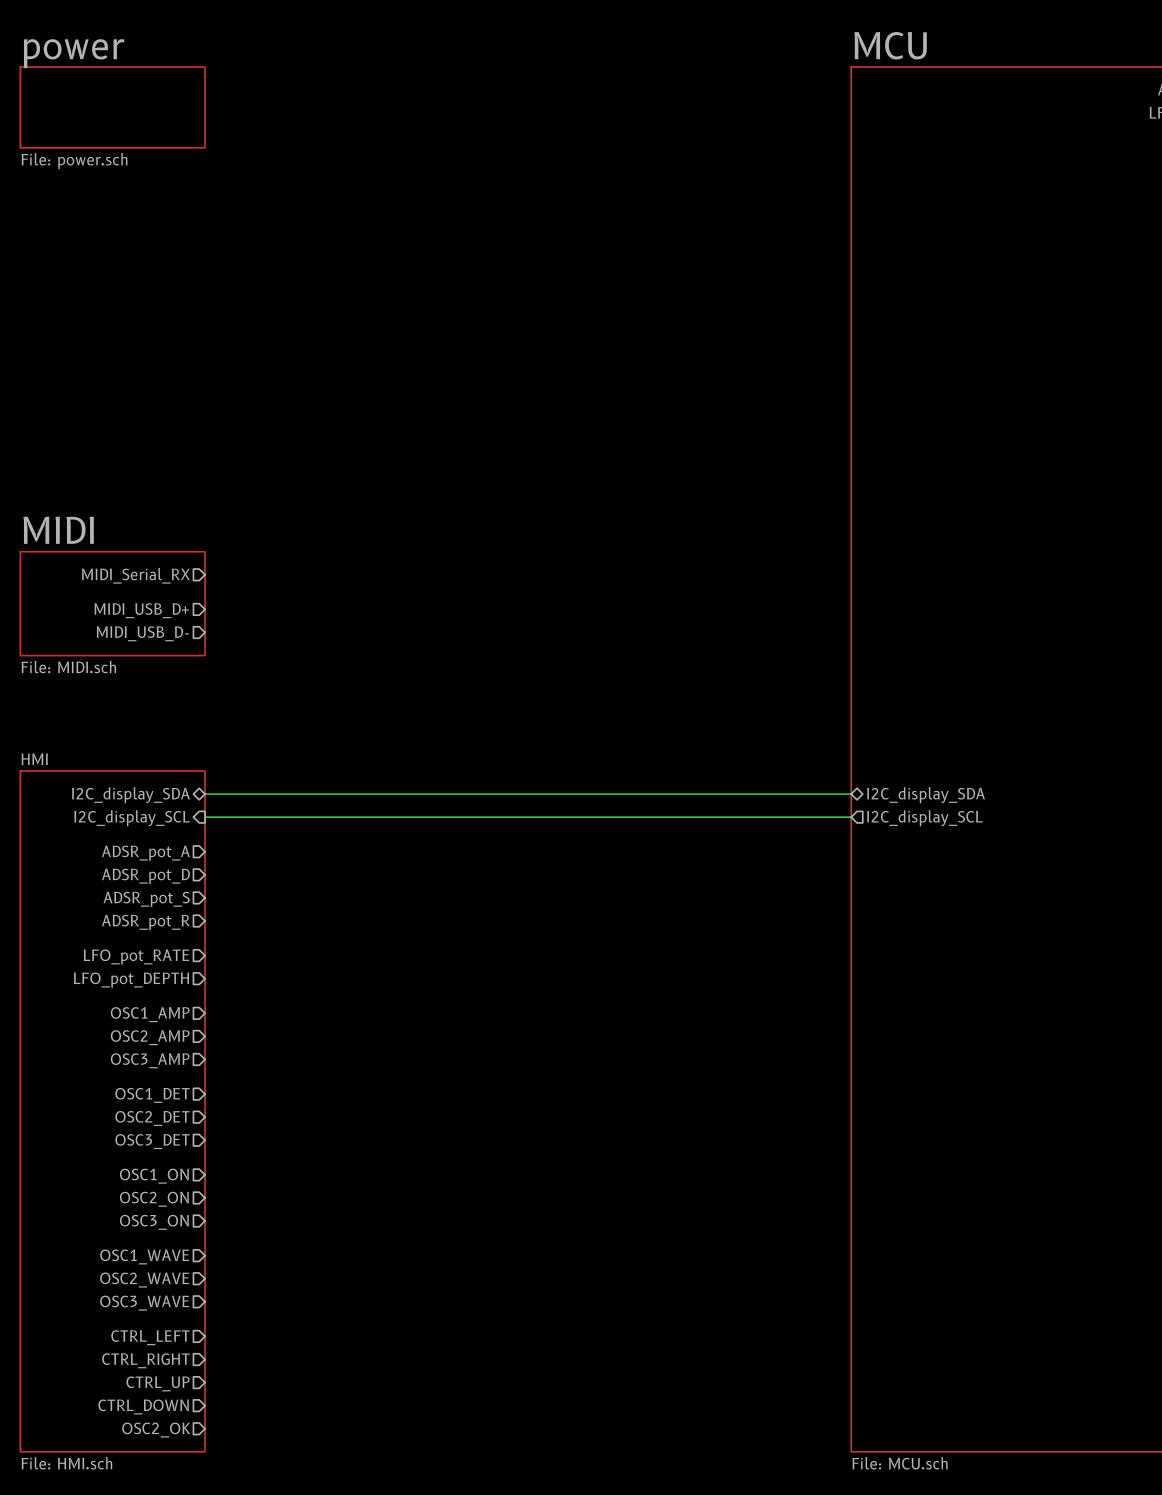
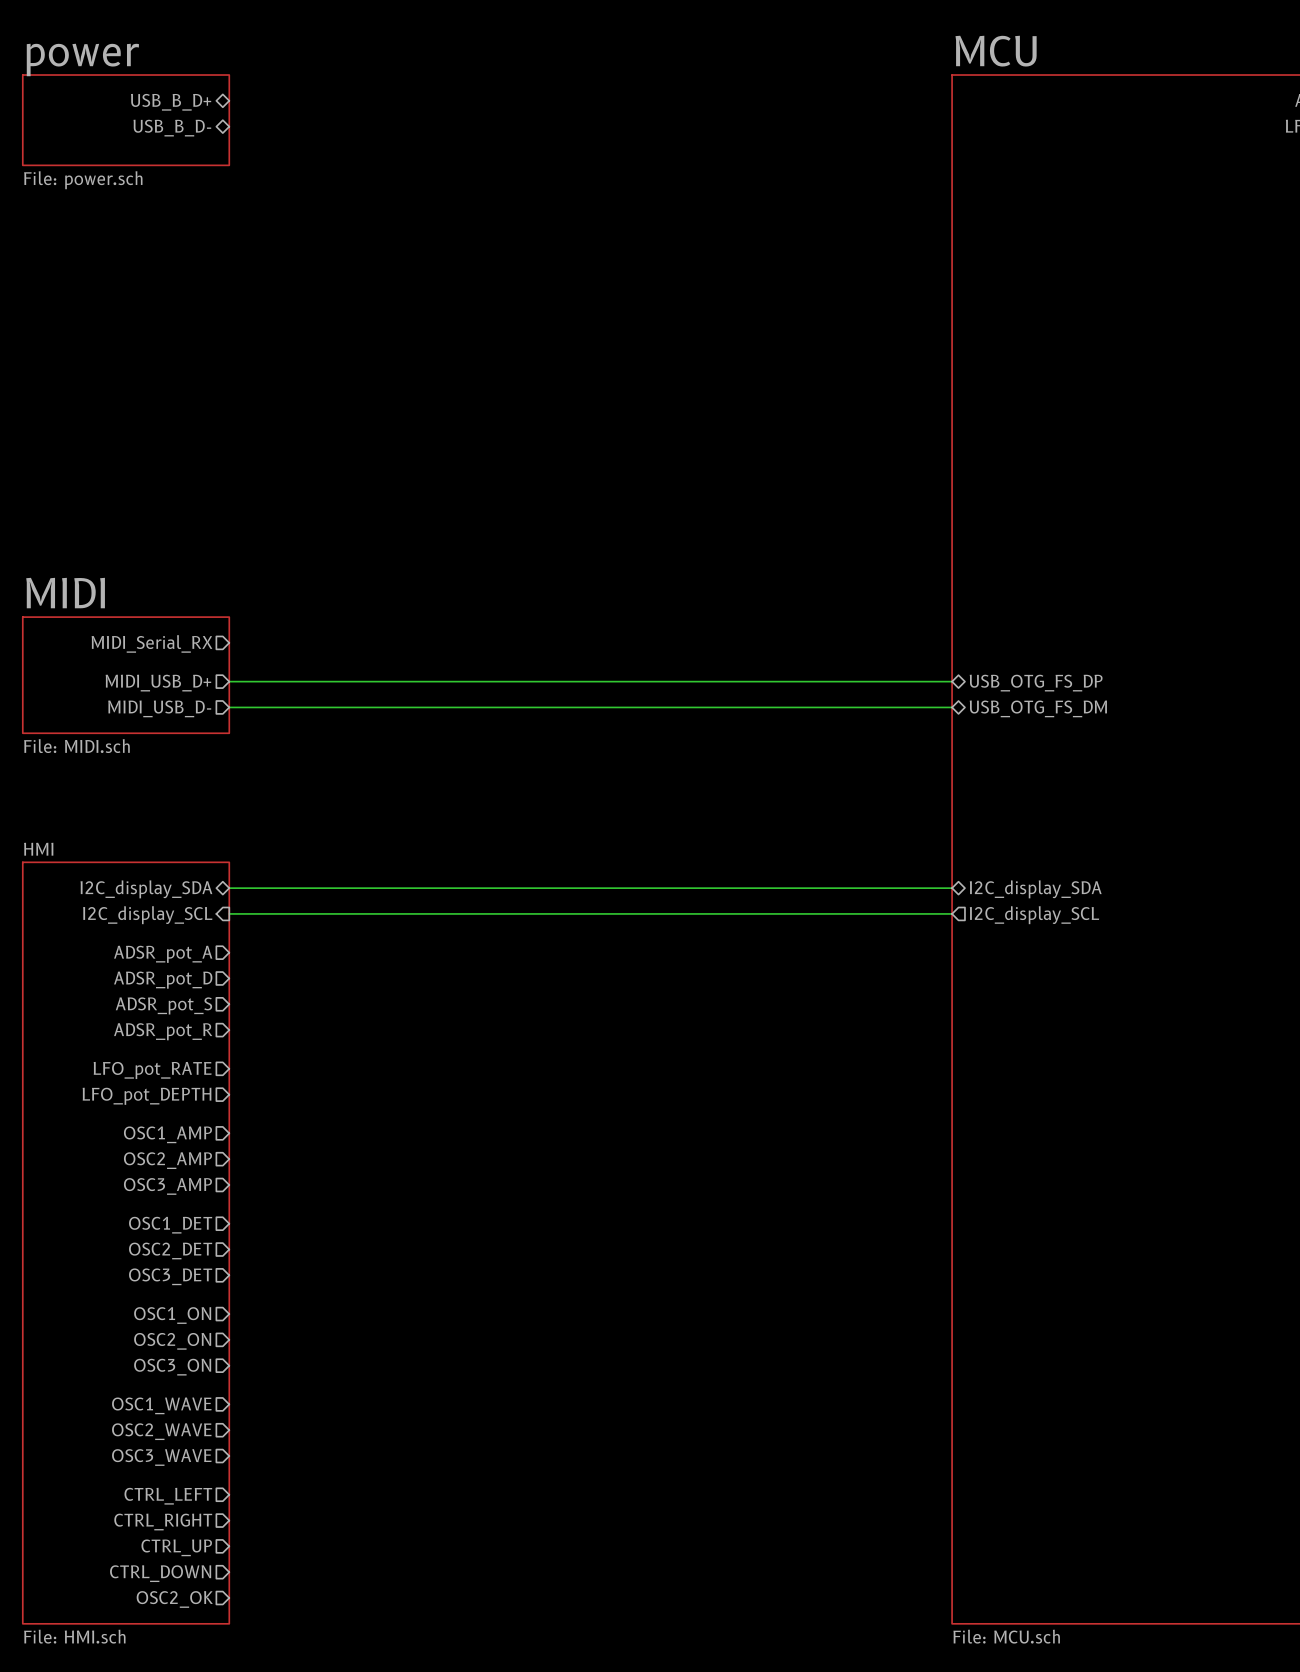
sheet pin: none -> USB_B_D+ (171, 102)
sheet pin: none -> USB_B_D- (172, 128)
wire: none -> (229, 681) (952, 681)
sheet pin: none -> USB_OTG_FS_DP (1036, 683)
wire: none -> (229, 707) (952, 707)
sheet pin: none -> USB_OTG_FS_DM (1038, 708)

